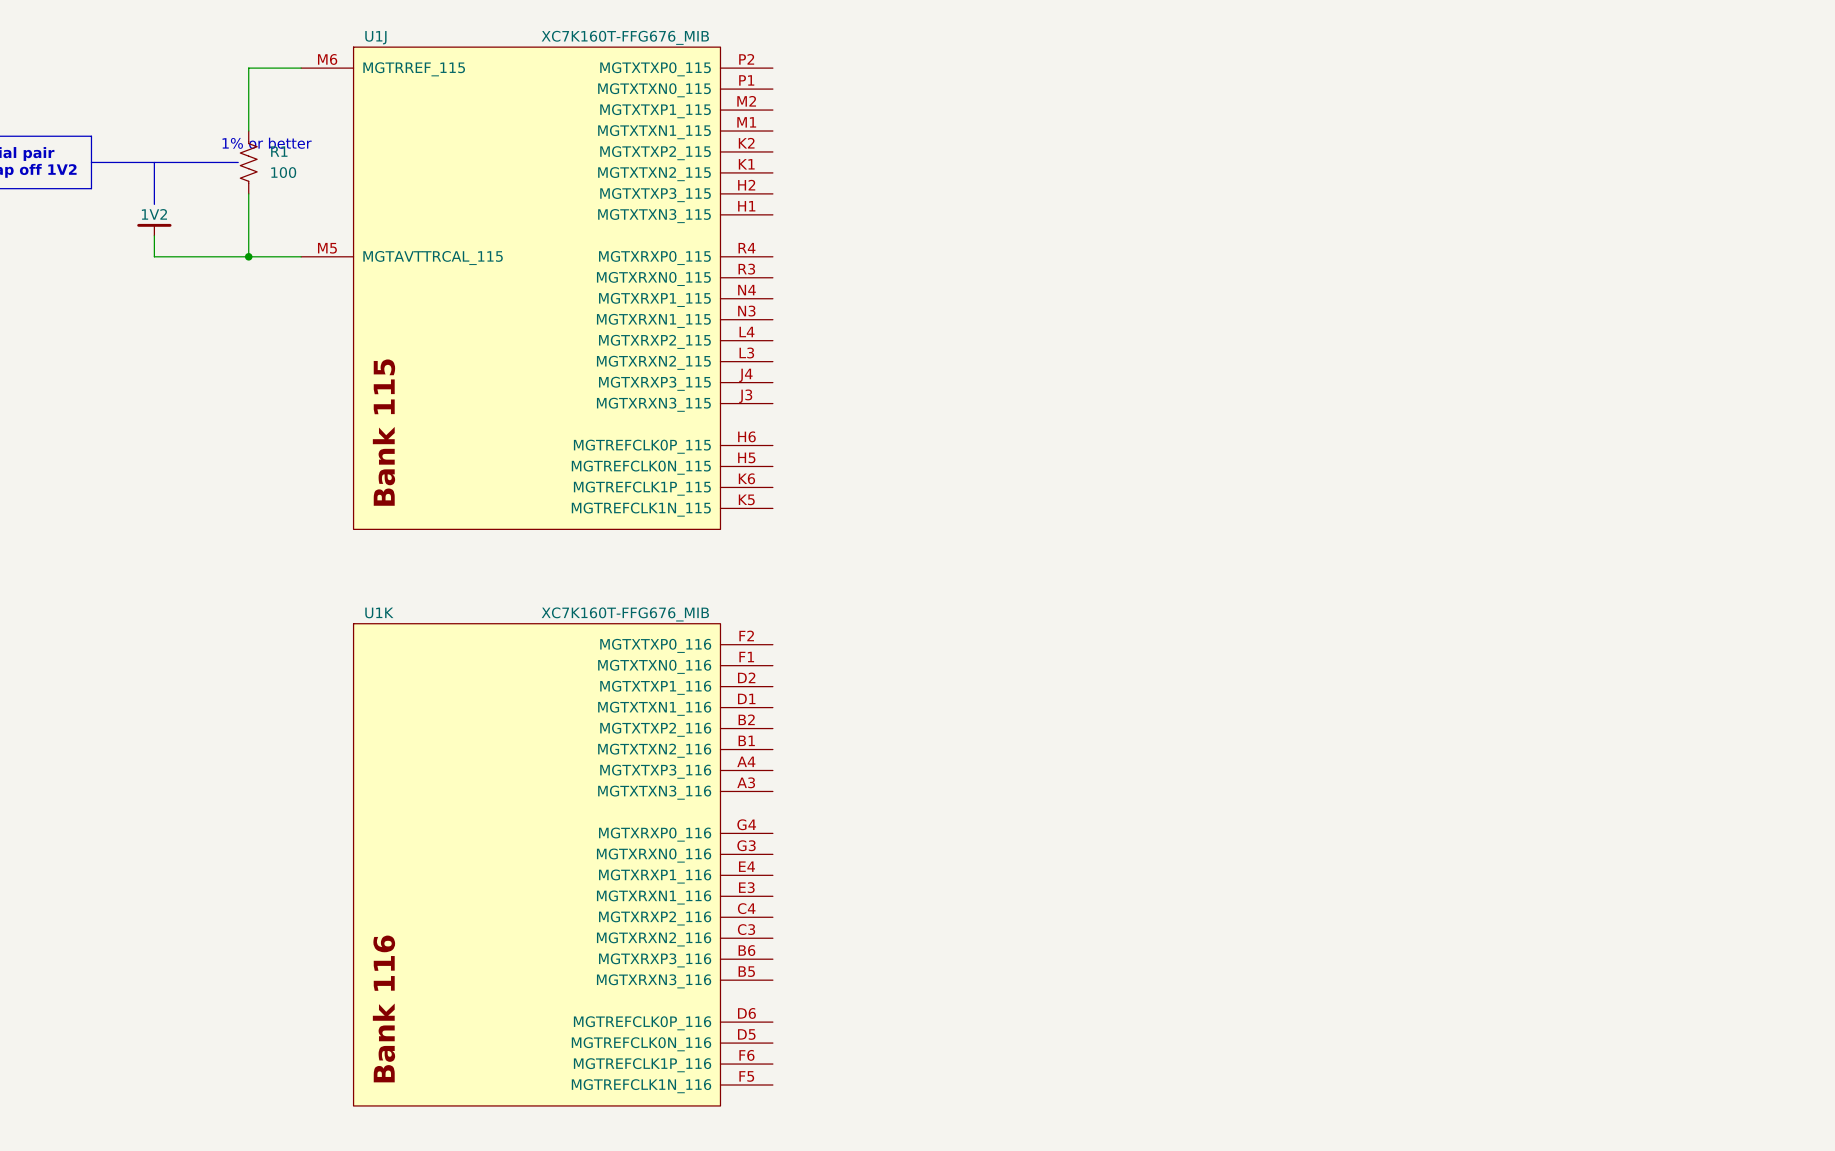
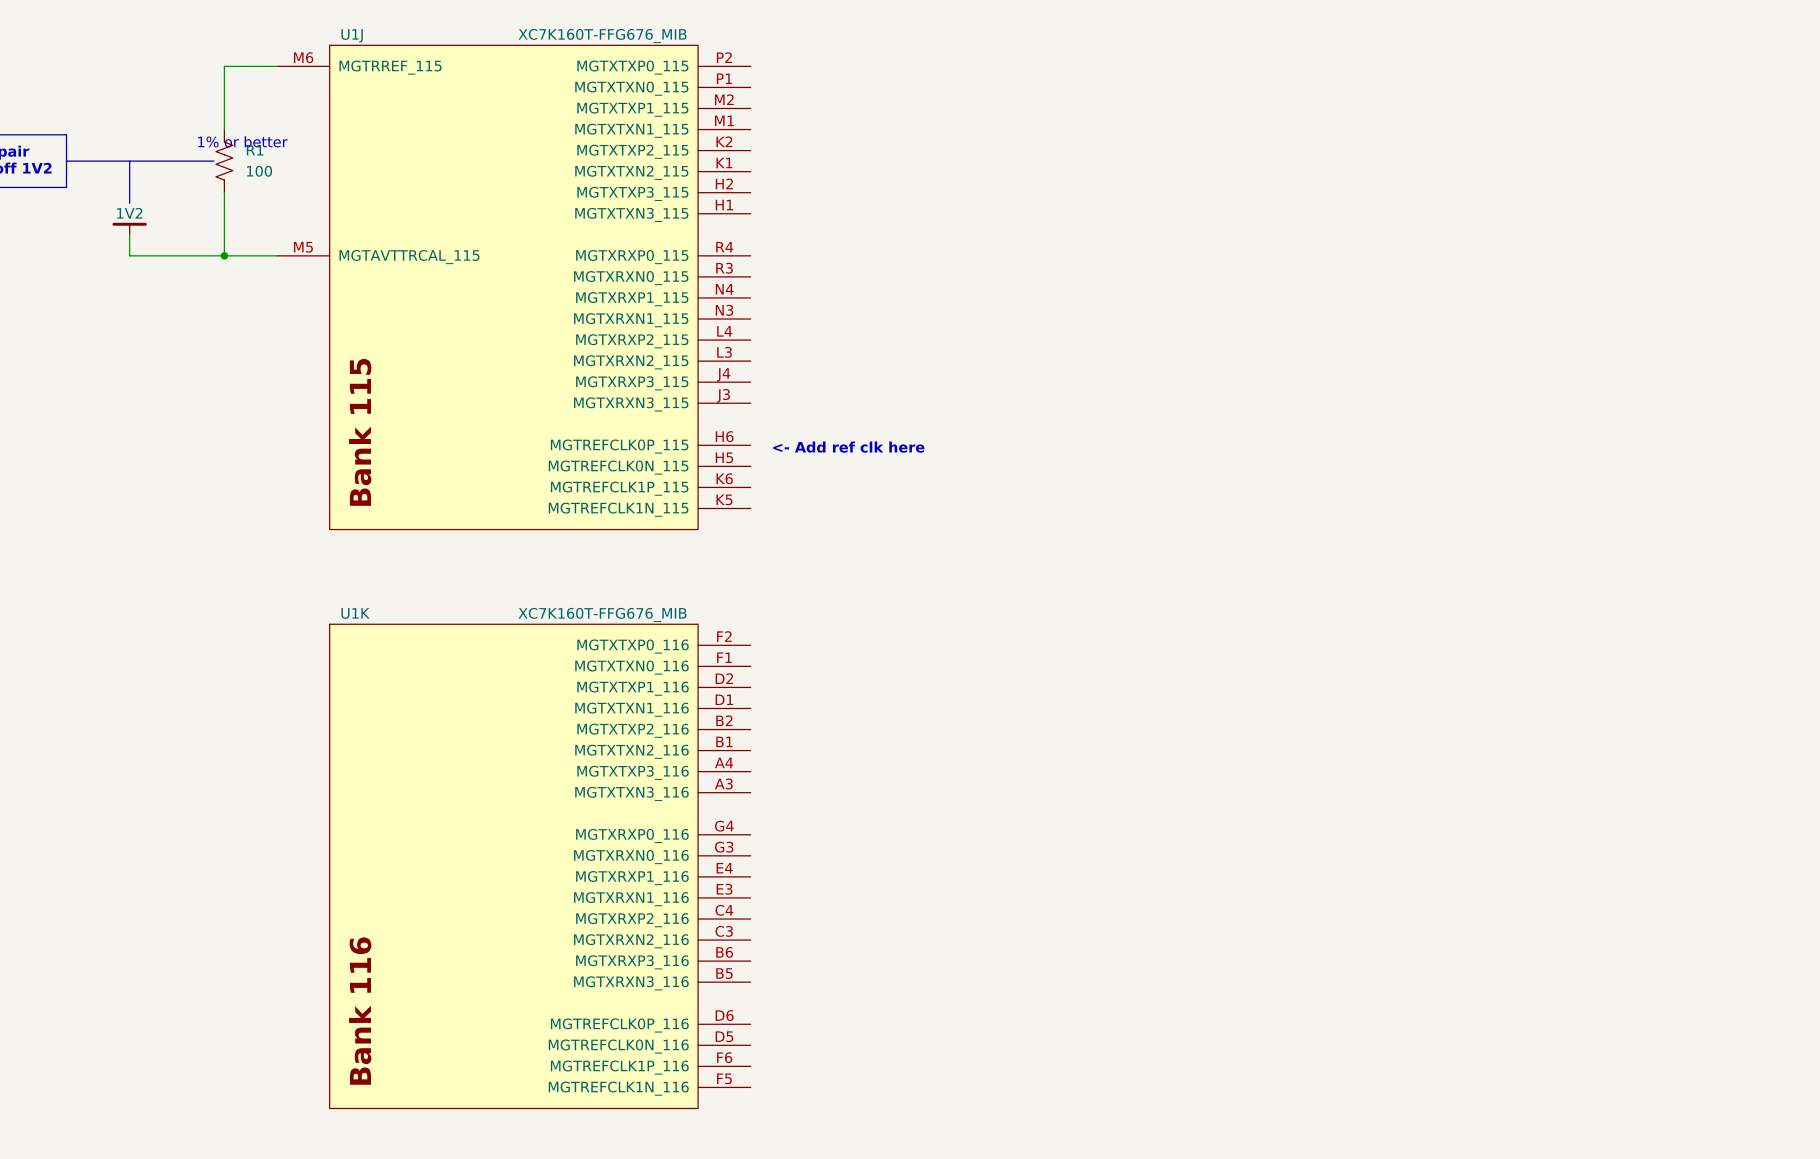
text: none -> <- Add ref clk here (848, 447)

